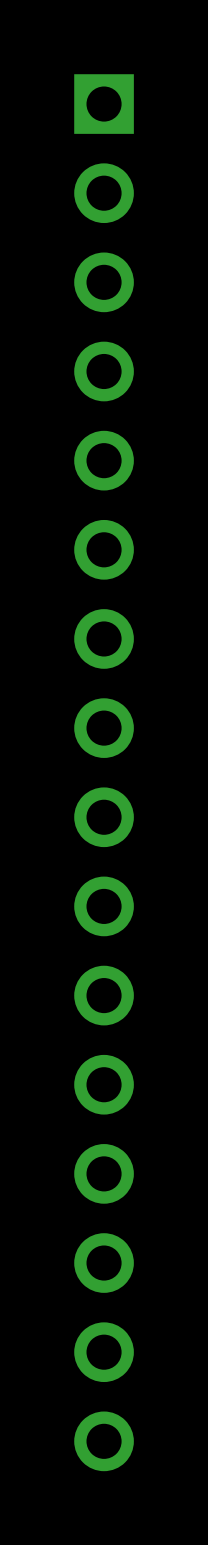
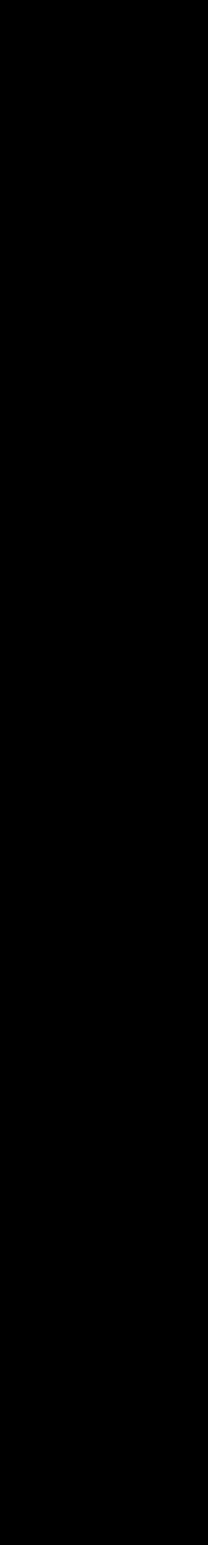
part: (104, 772) -> none

